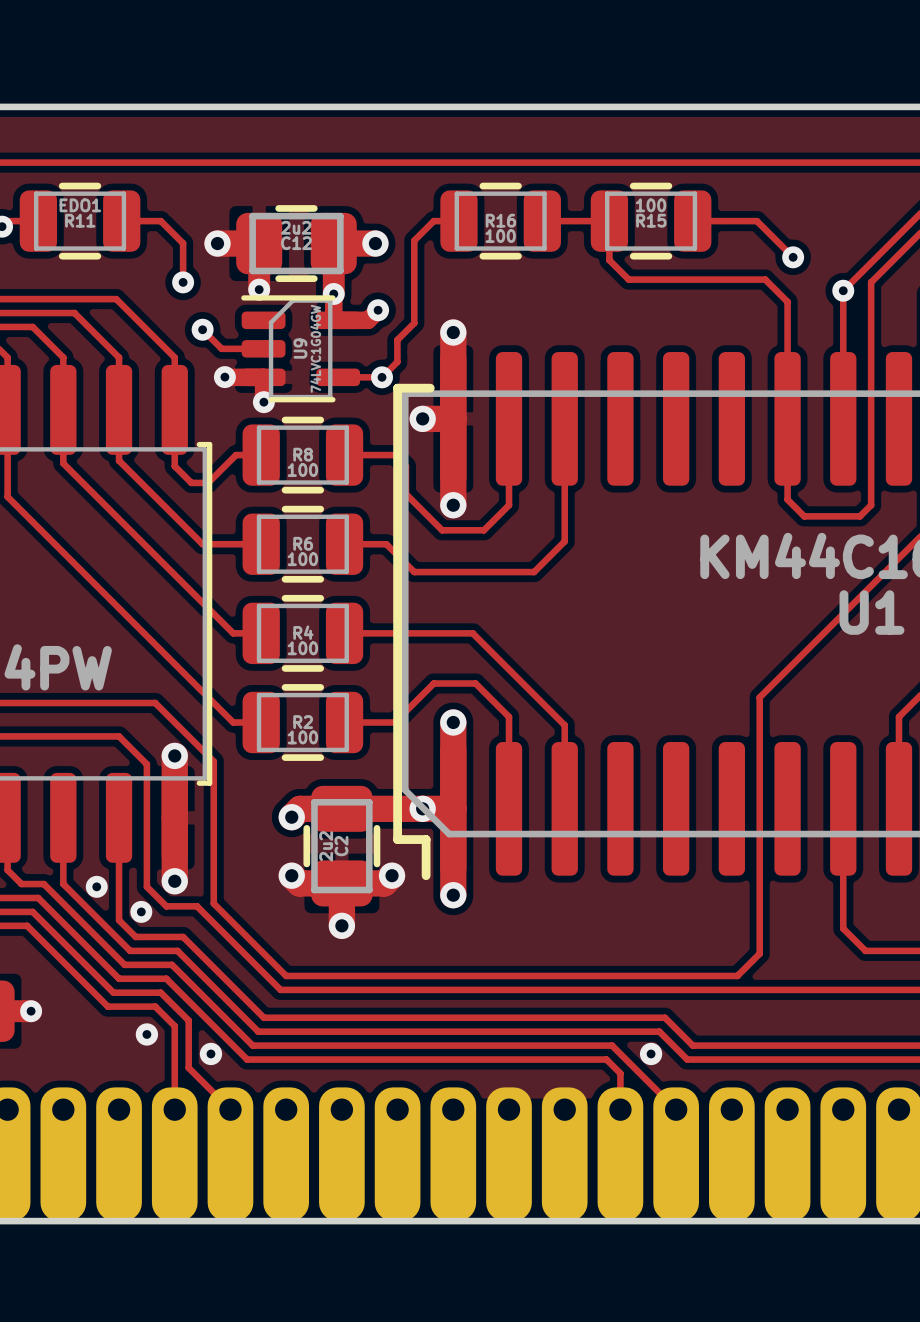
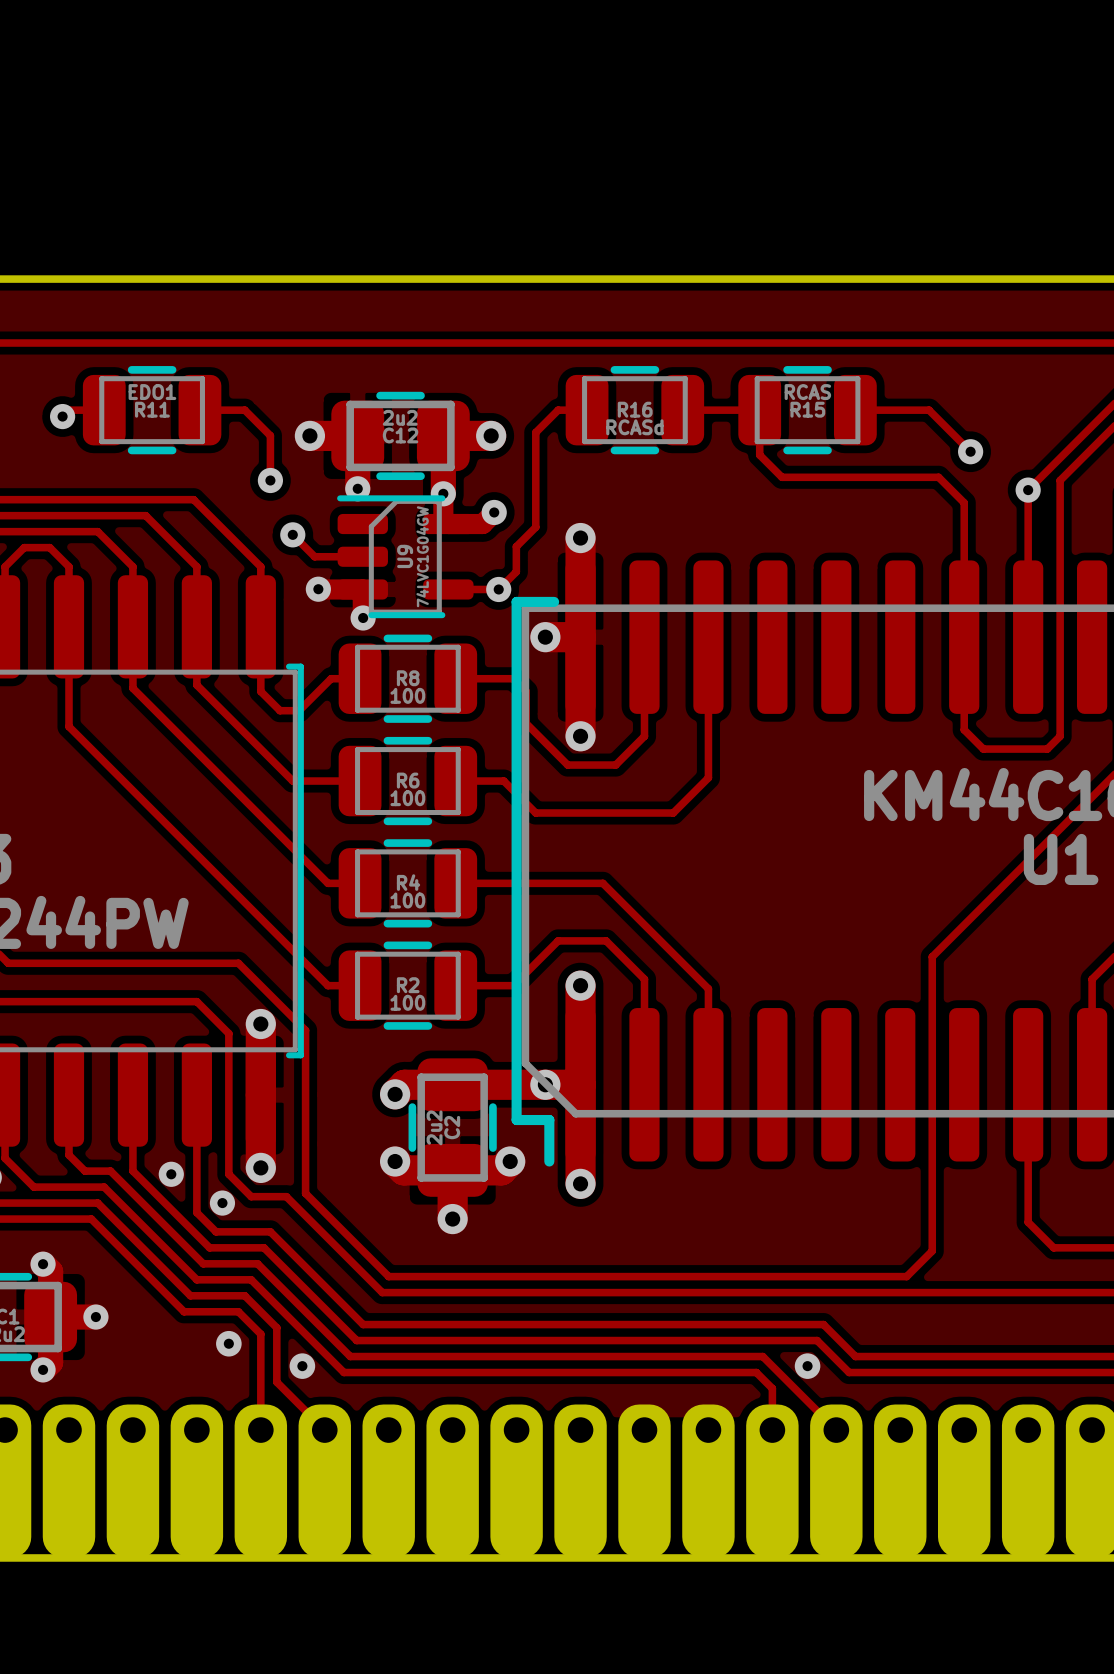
R15 value: 100 (651, 205) -> RCAS (807, 392)
R16 value: 100 (500, 236) -> RCASd (634, 427)

